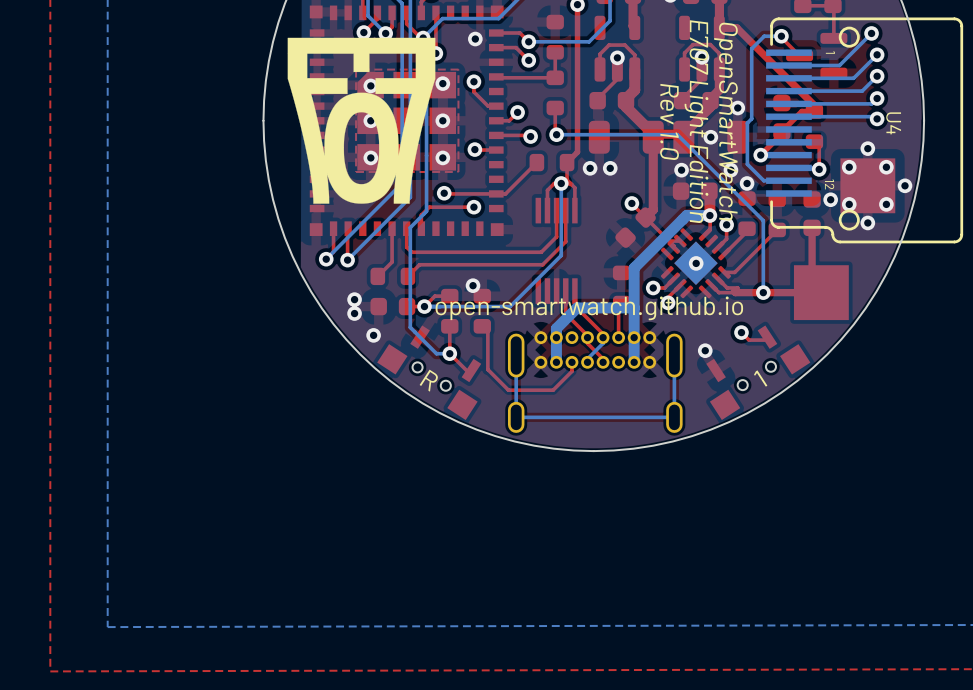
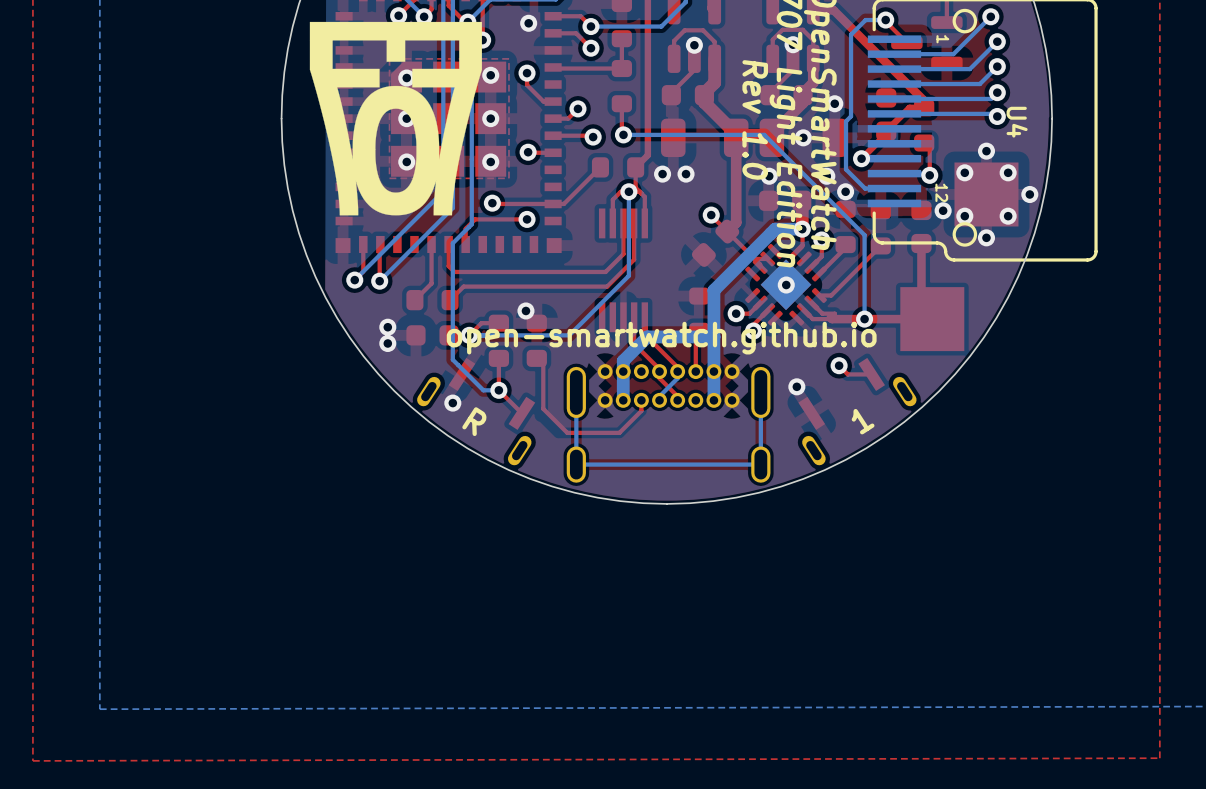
part footprint: [377, 325, 482, 421] -> [417, 357, 536, 466]
part footprint: [706, 325, 811, 421] -> [798, 357, 917, 466]
via position: (373, 335) -> (452, 403)

